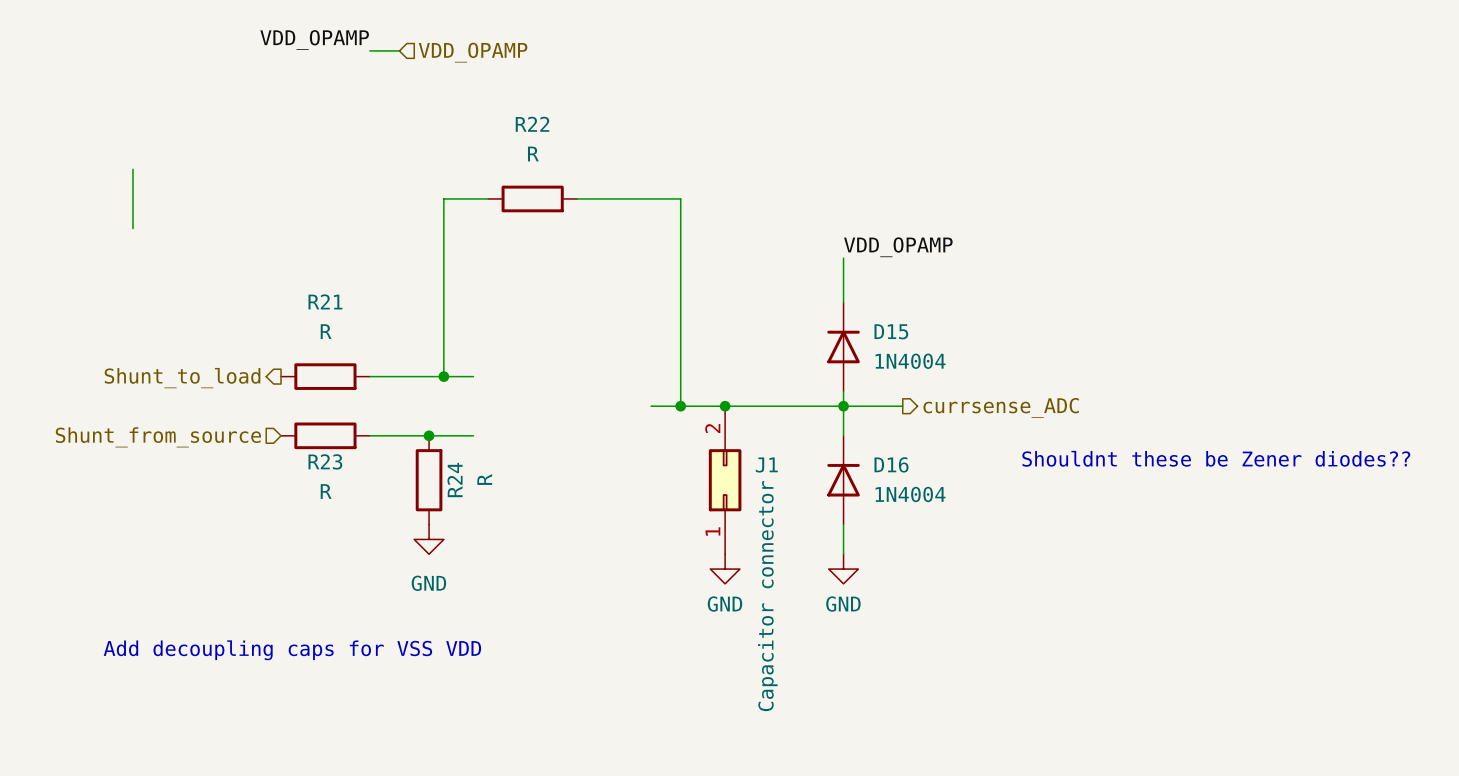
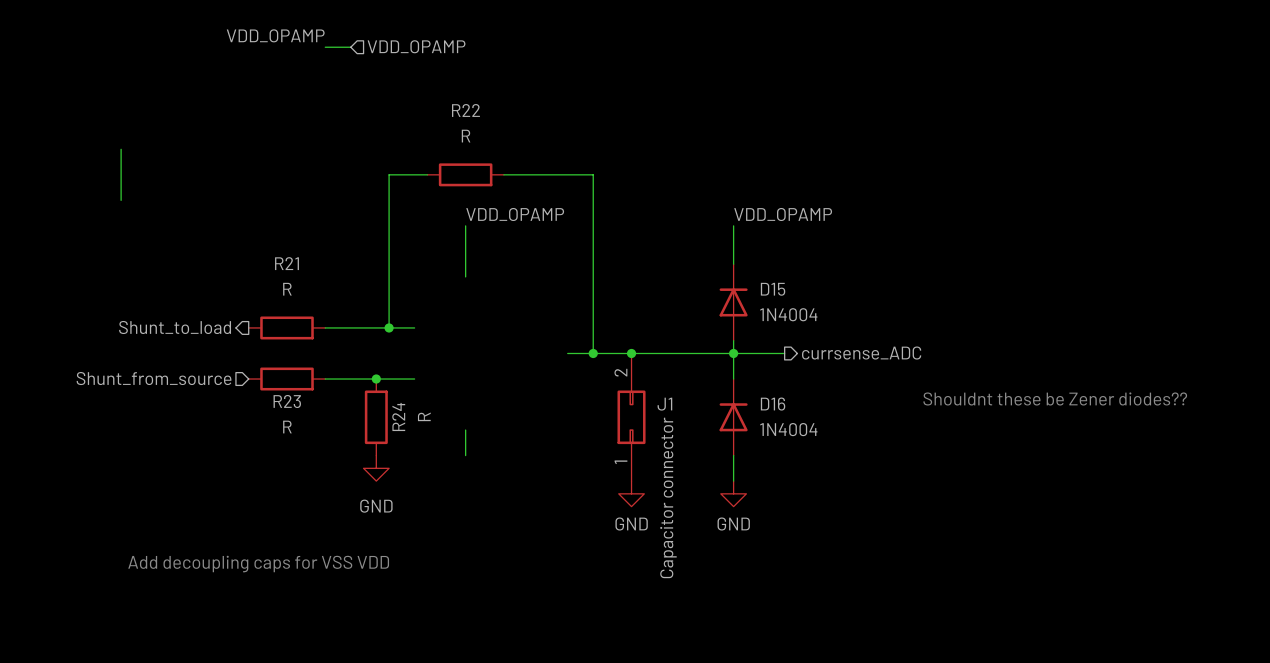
label: none -> VDD_OPAMP (515, 214)
wire: none -> (465, 225) (465, 276)
wire: none -> (465, 430) (465, 455)

